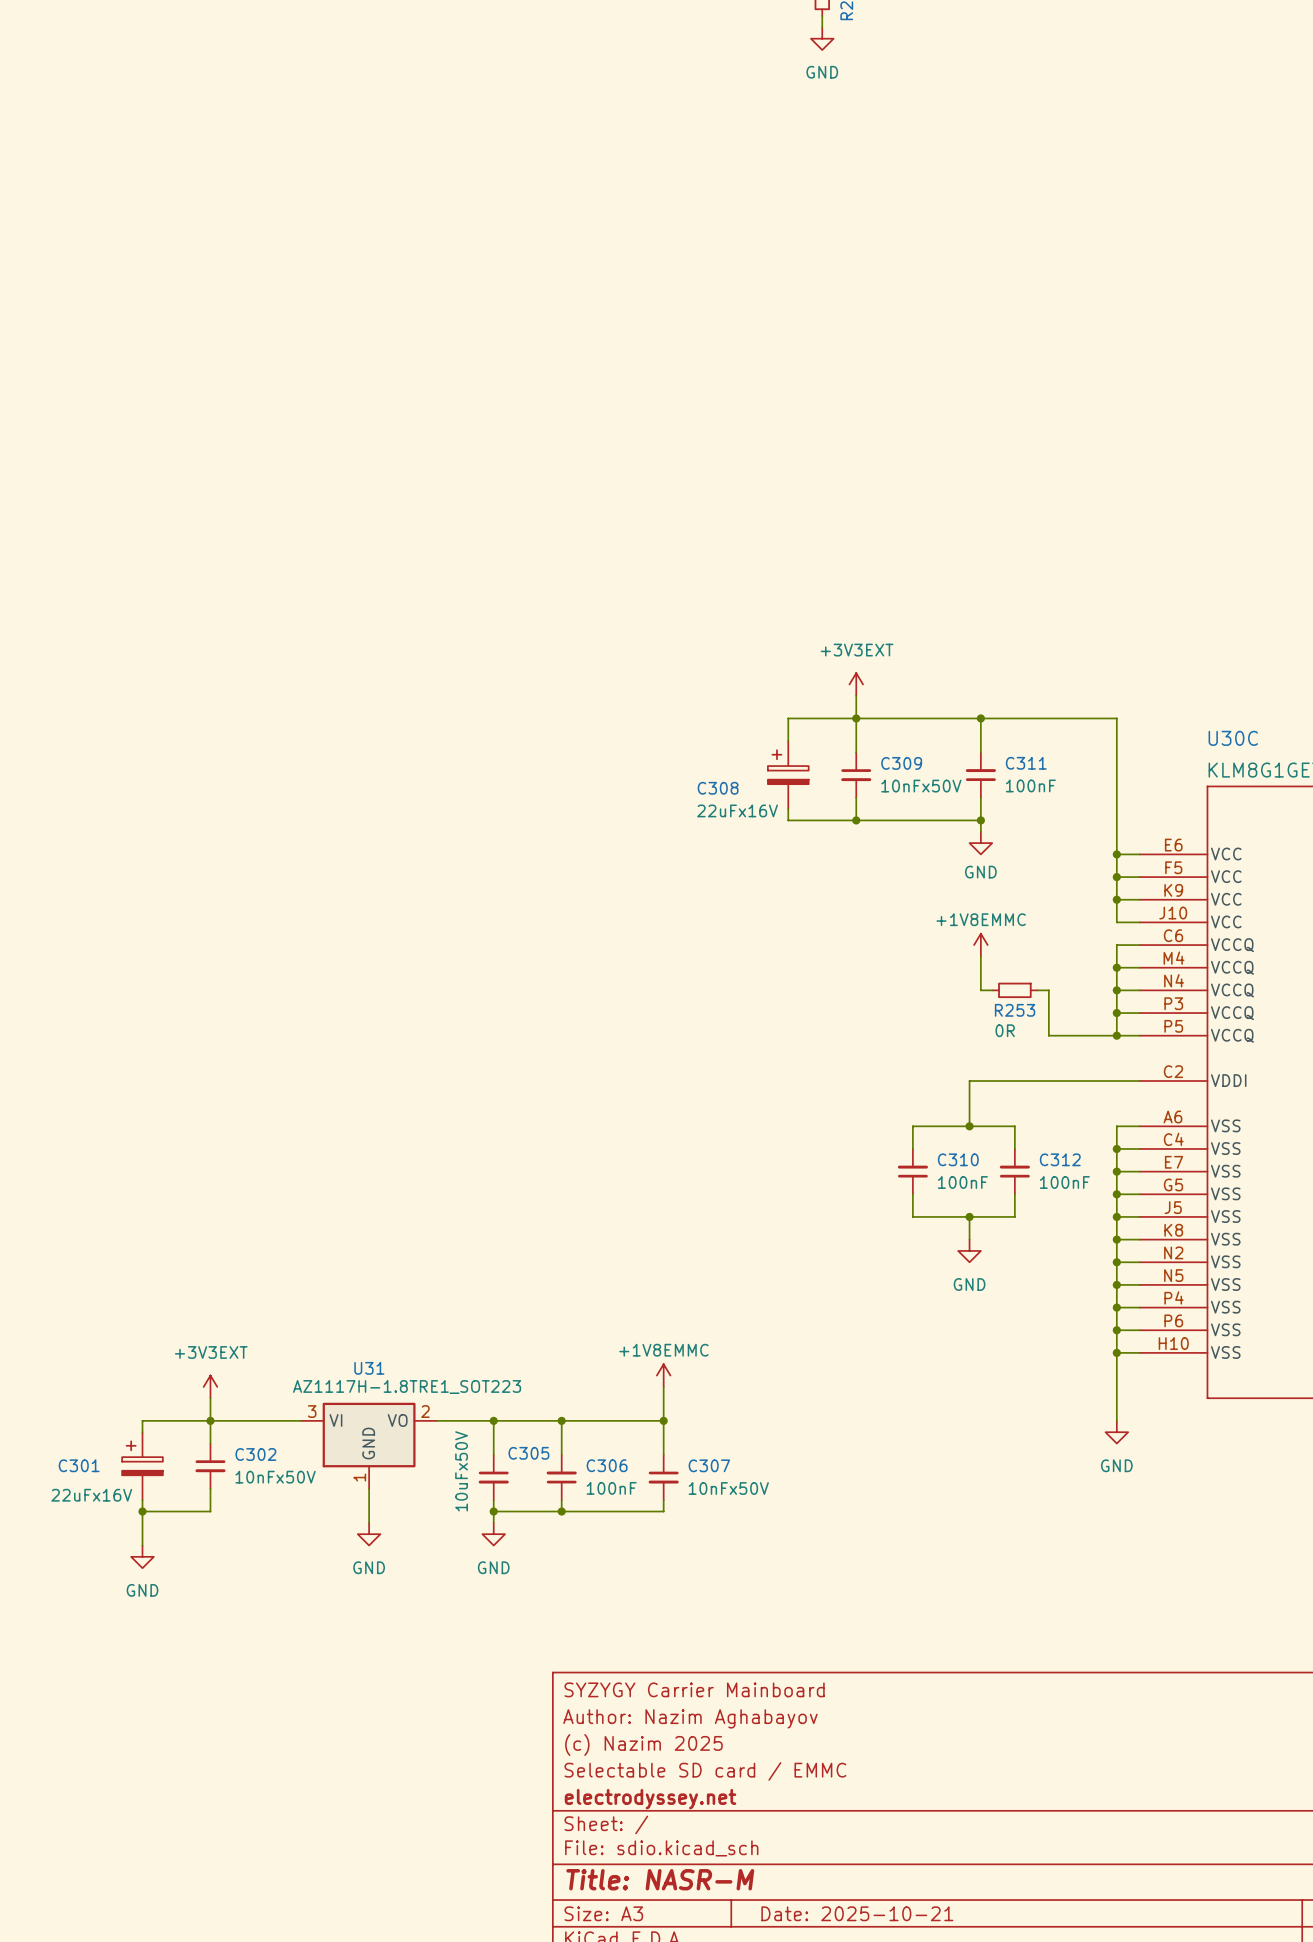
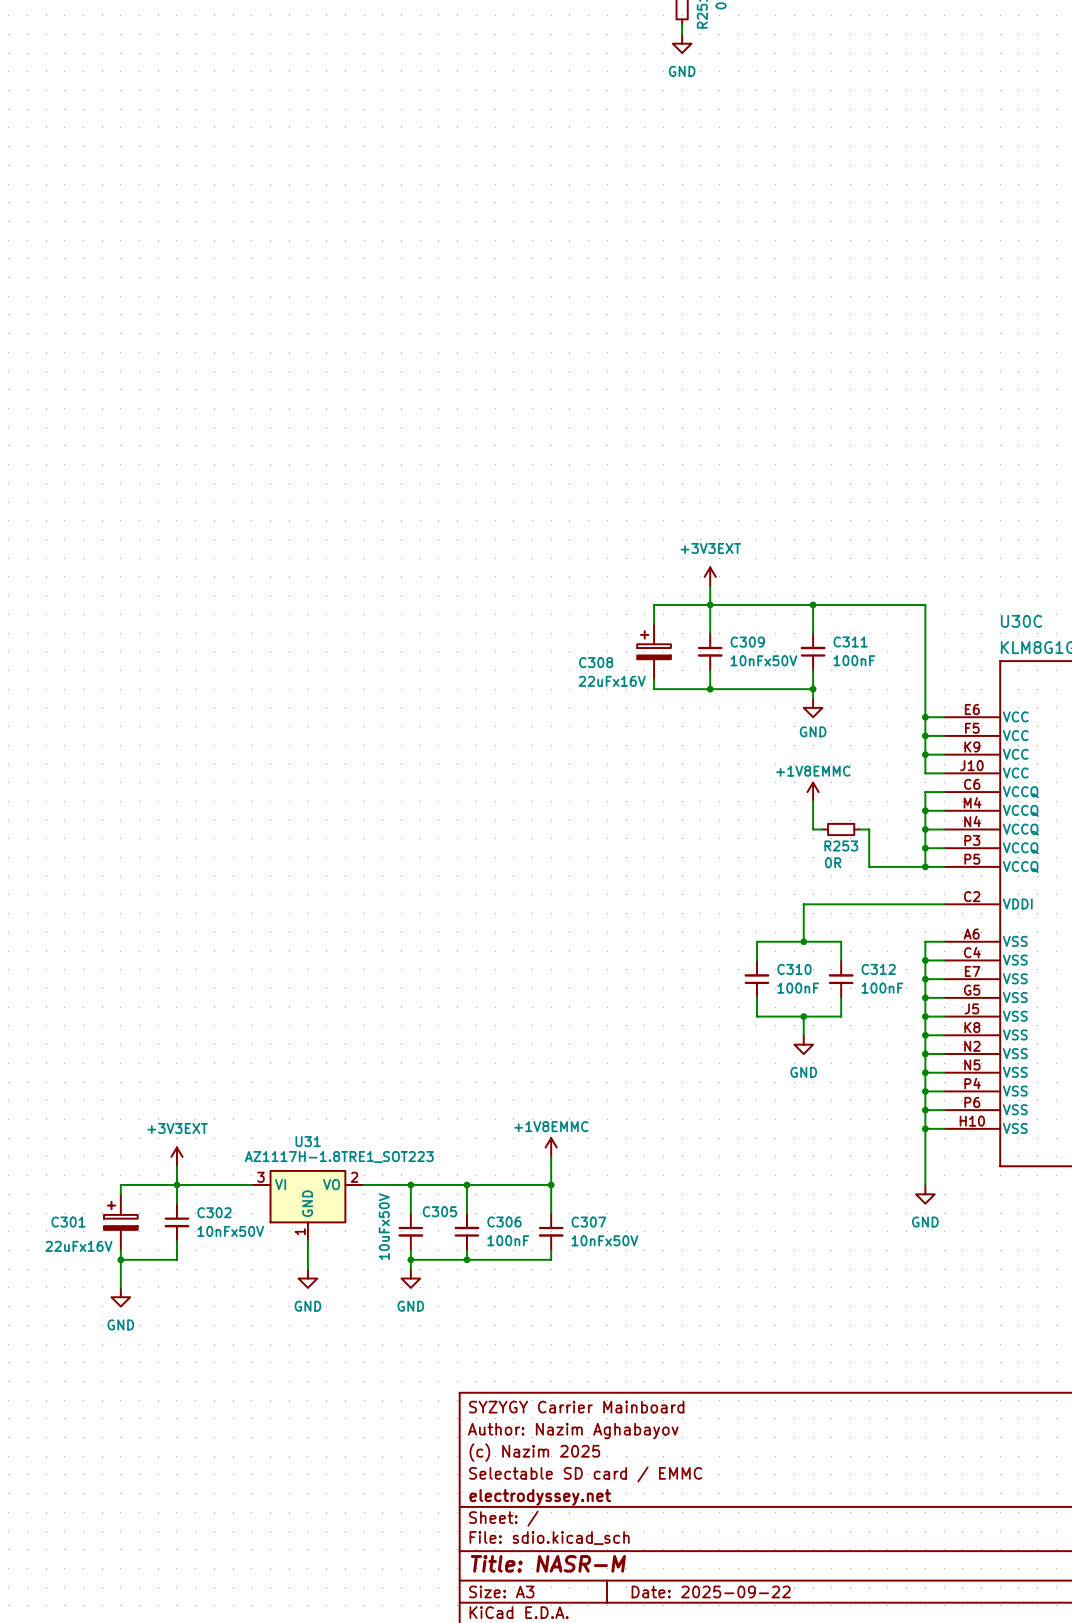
title block: Date: 2025-10-21 (857, 1913) -> Date: 2025-09-22 (711, 1591)

